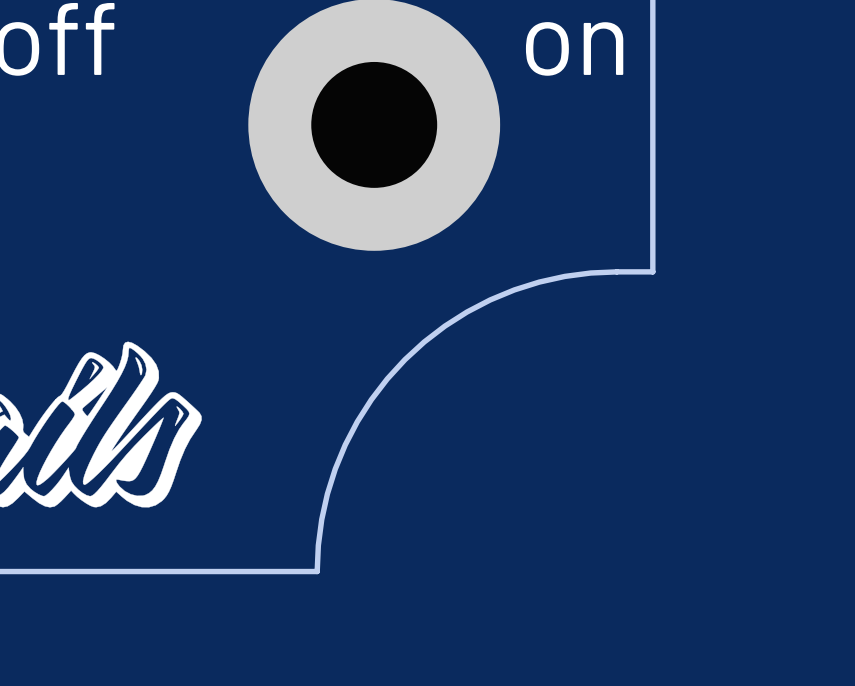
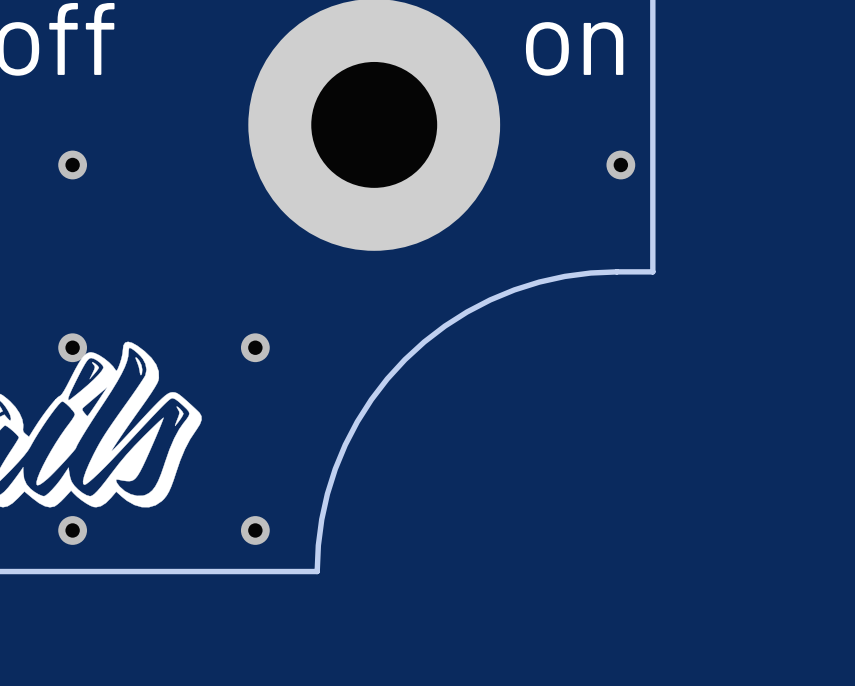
via: none -> (72, 164)
via: none -> (620, 164)
via: none -> (72, 347)
via: none -> (255, 347)
via: none -> (72, 530)
via: none -> (255, 530)

